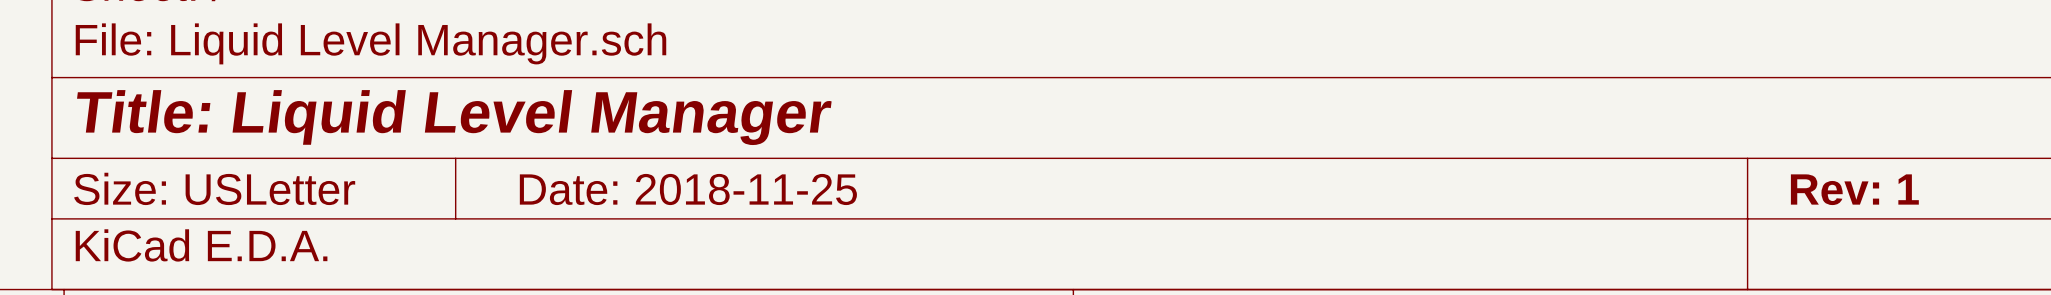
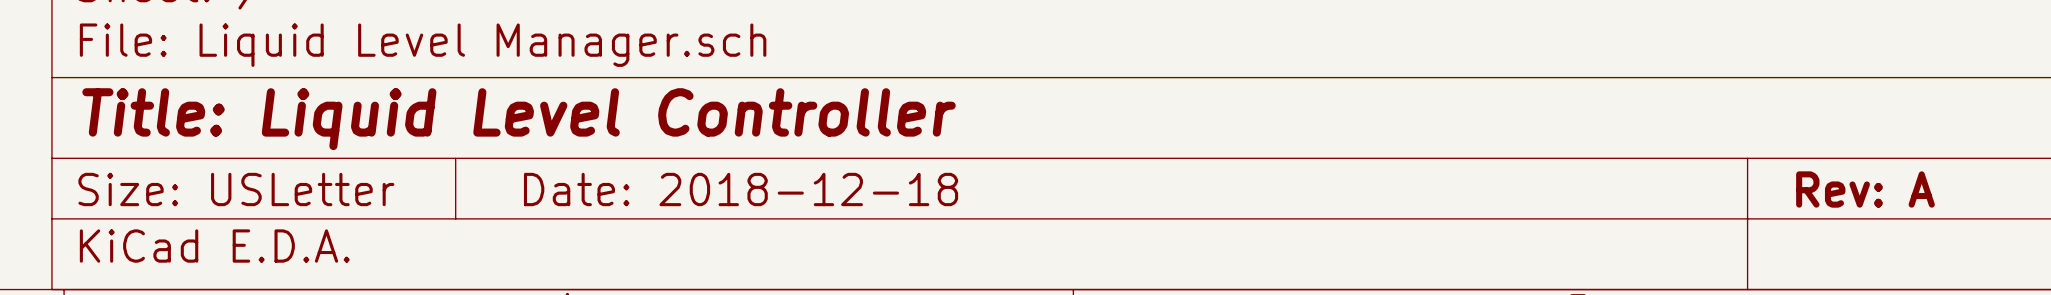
title block: Title: Liquid Level Manager (454, 117) -> Title: Liquid Level Controller (519, 119)
title block: Date: 2018-11-25 (688, 189) -> Date: 2018-12-18 (741, 189)
title block: Rev: 1 (1854, 189) -> Rev: A (1865, 189)

